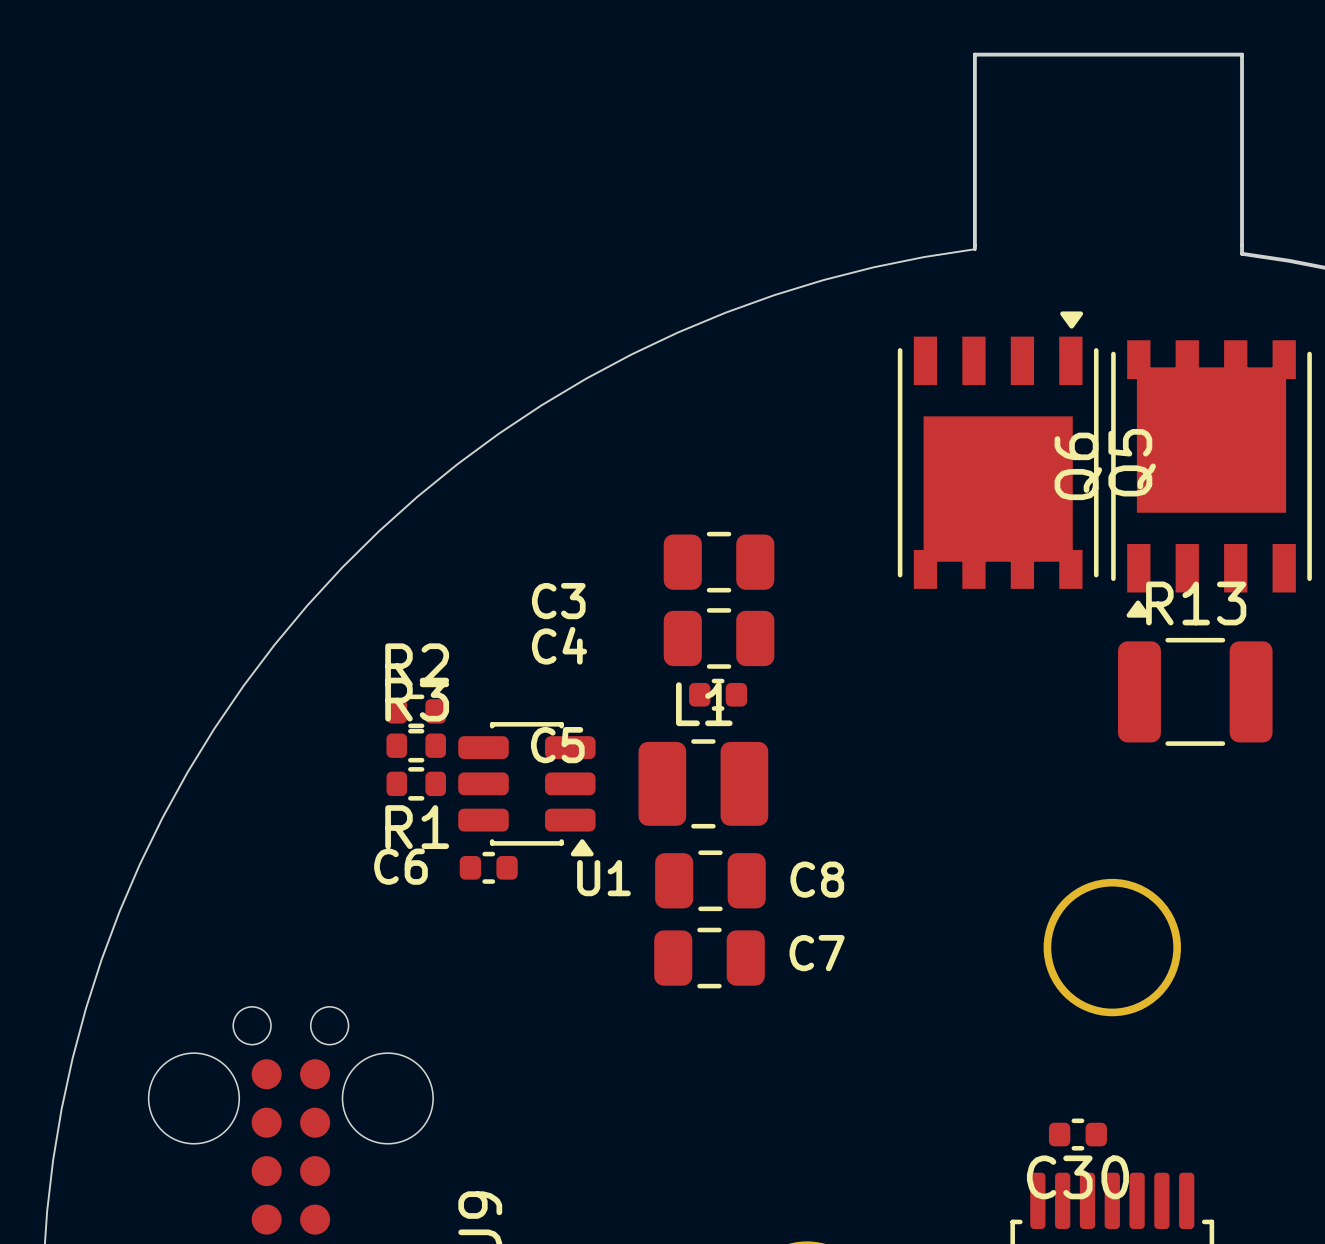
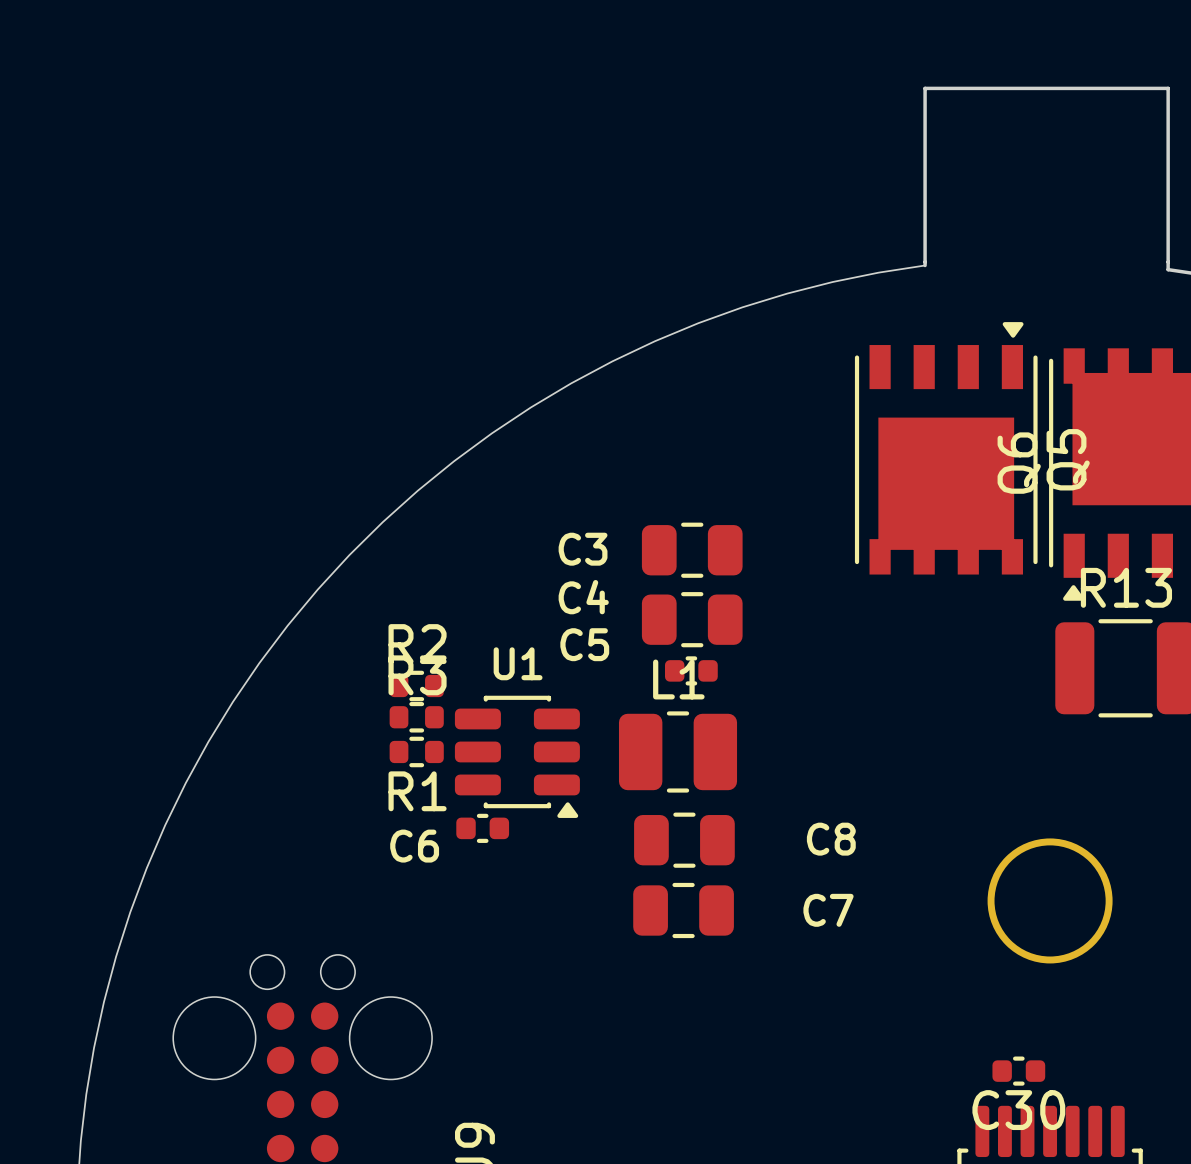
C3 name position: C3 (558, 601) -> C3 (583, 549)
C4 name position: C4 (559, 645) -> C4 (583, 597)
C5 name position: C5 (557, 745) -> C5 (584, 644)
C6 name position: C6 (400, 866) -> C6 (414, 846)
U1 name position: U1 (603, 878) -> U1 (518, 663)
C8 name position: C8 (817, 879) -> C8 (831, 839)
C7 name position: C7 (817, 953) -> C7 (828, 910)

